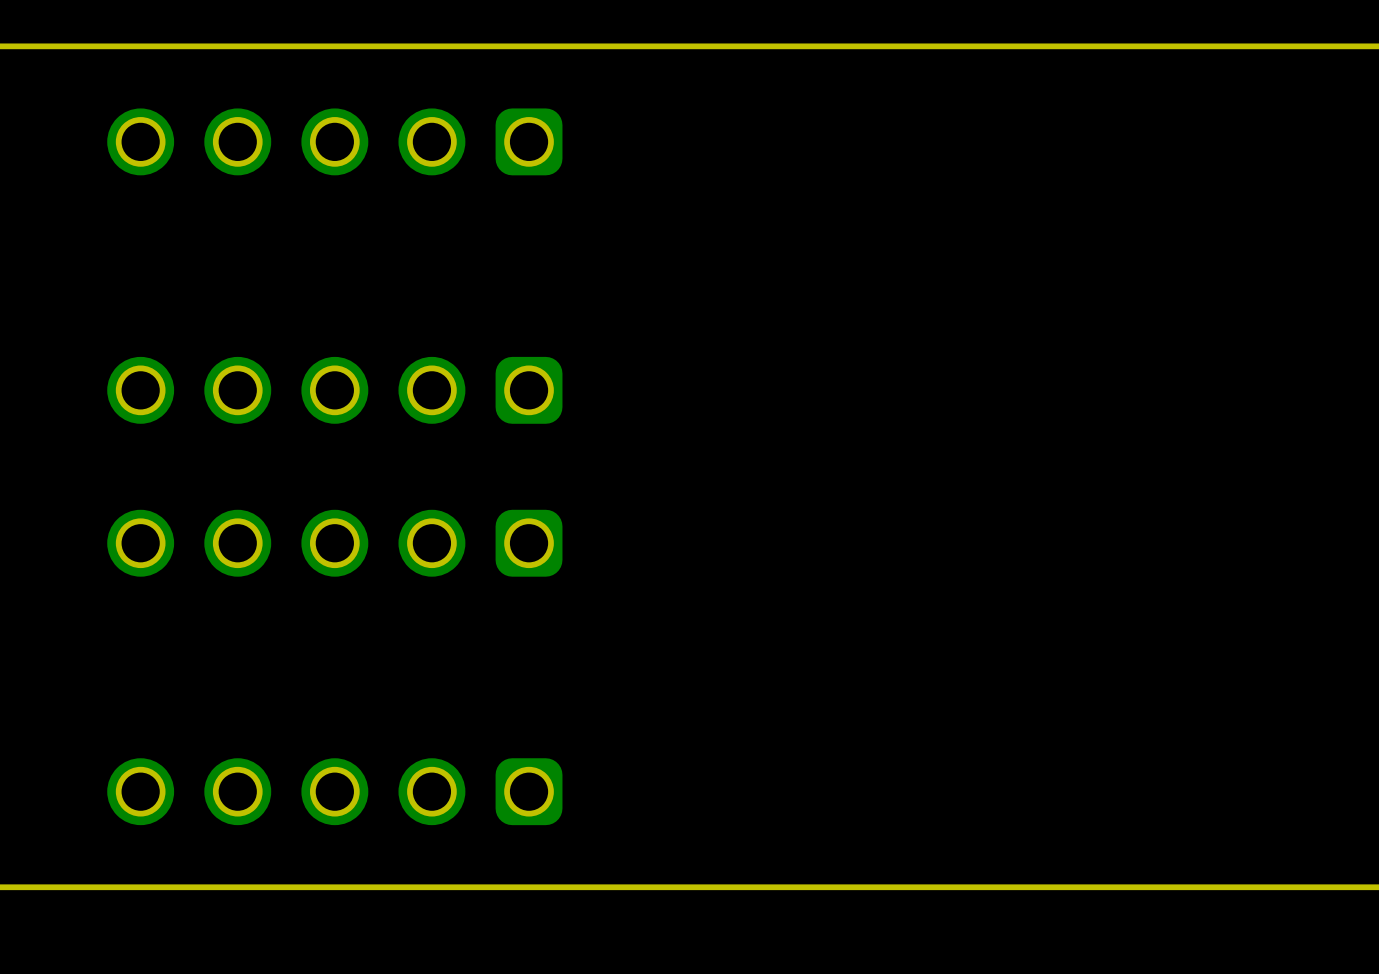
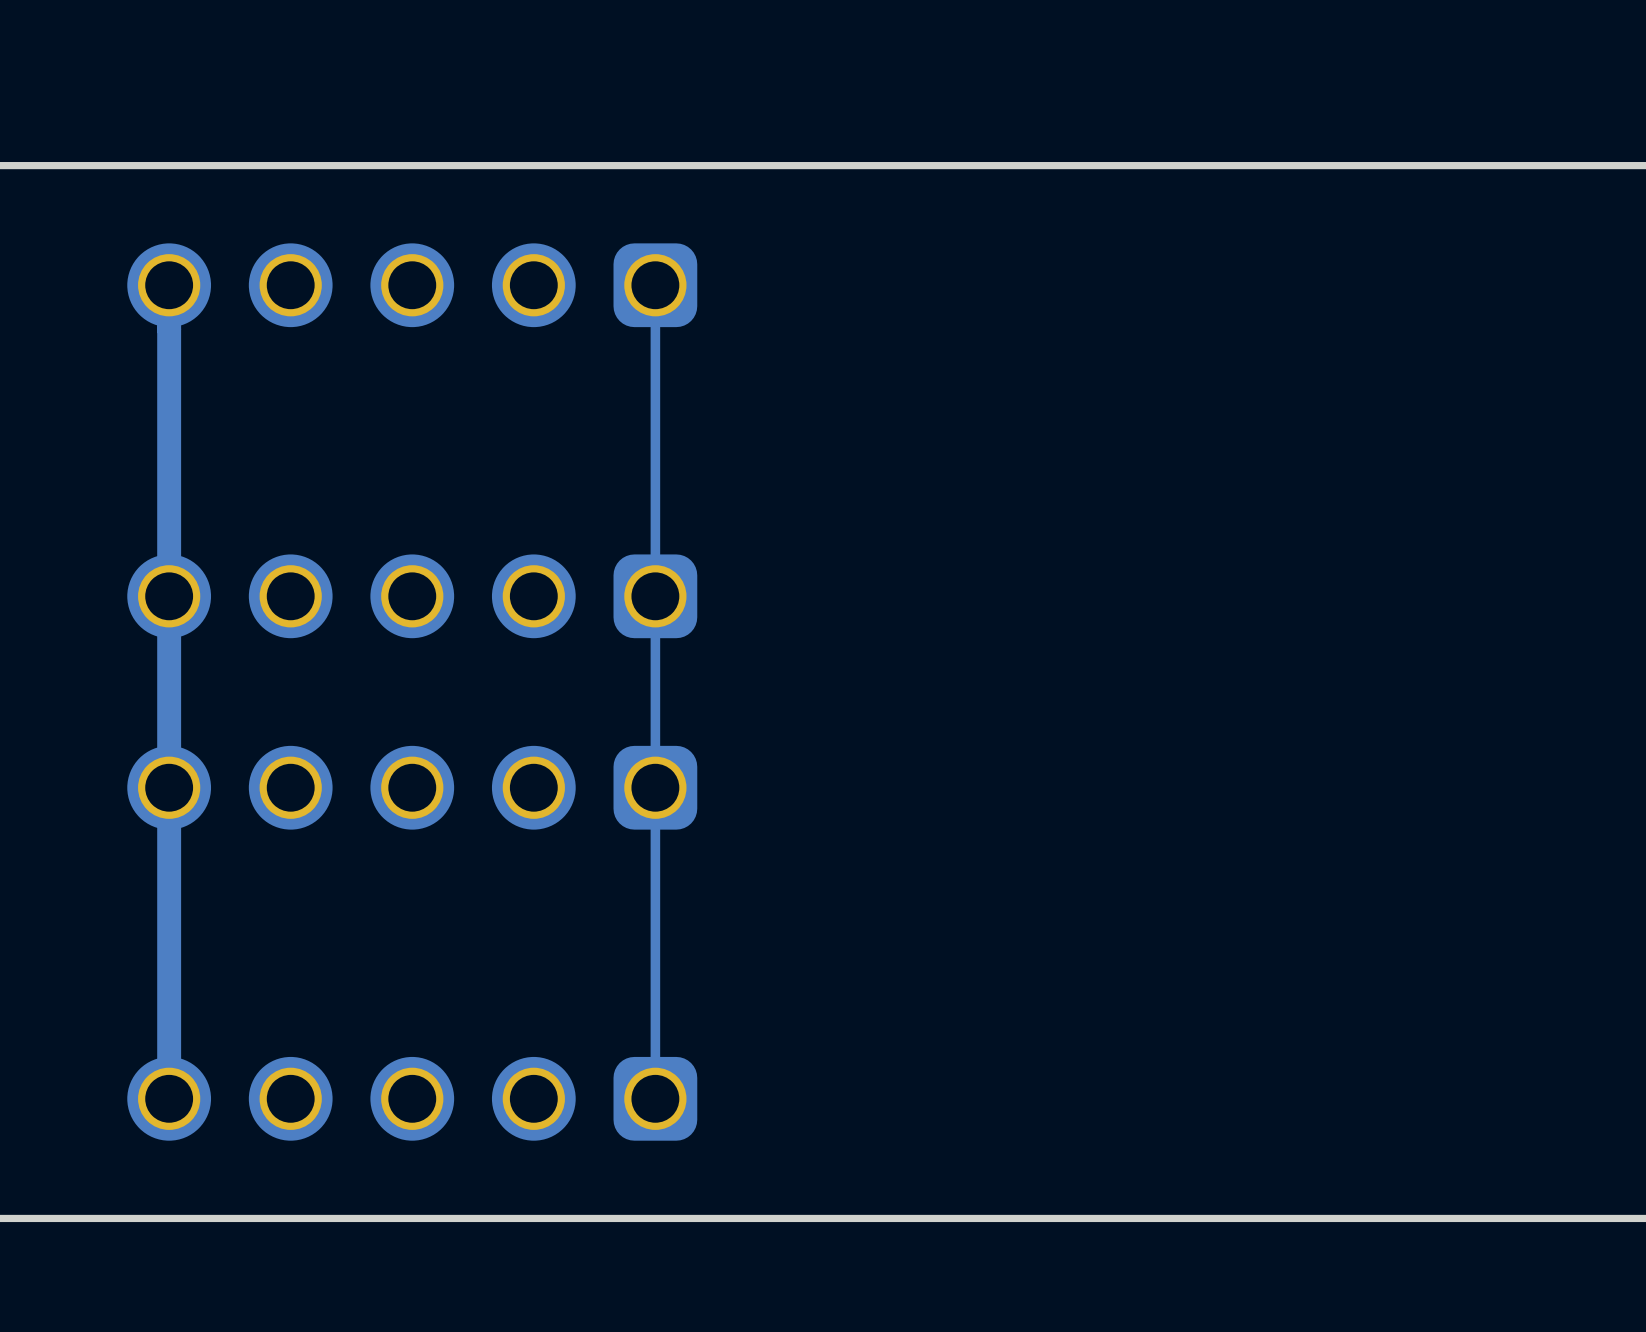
track: none -> (169, 285) (169, 1098)
track: none -> (655, 285) (655, 1098)

